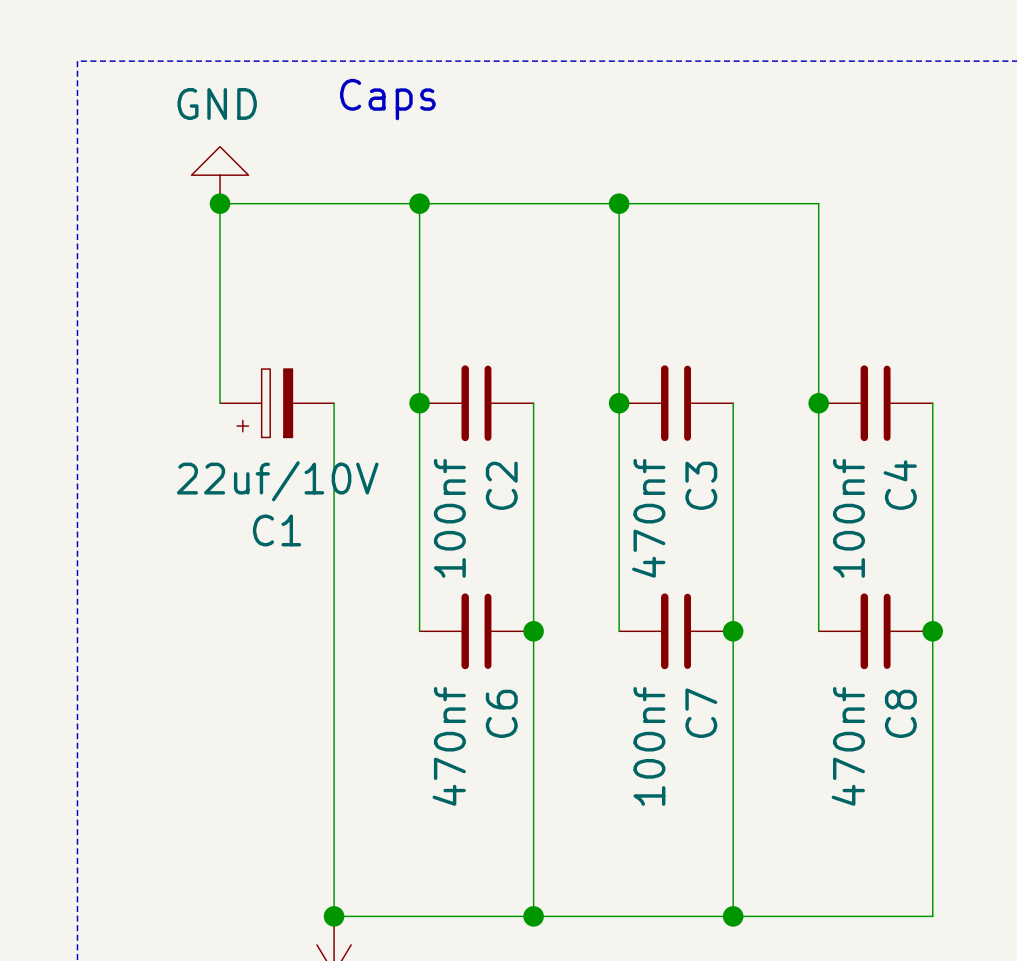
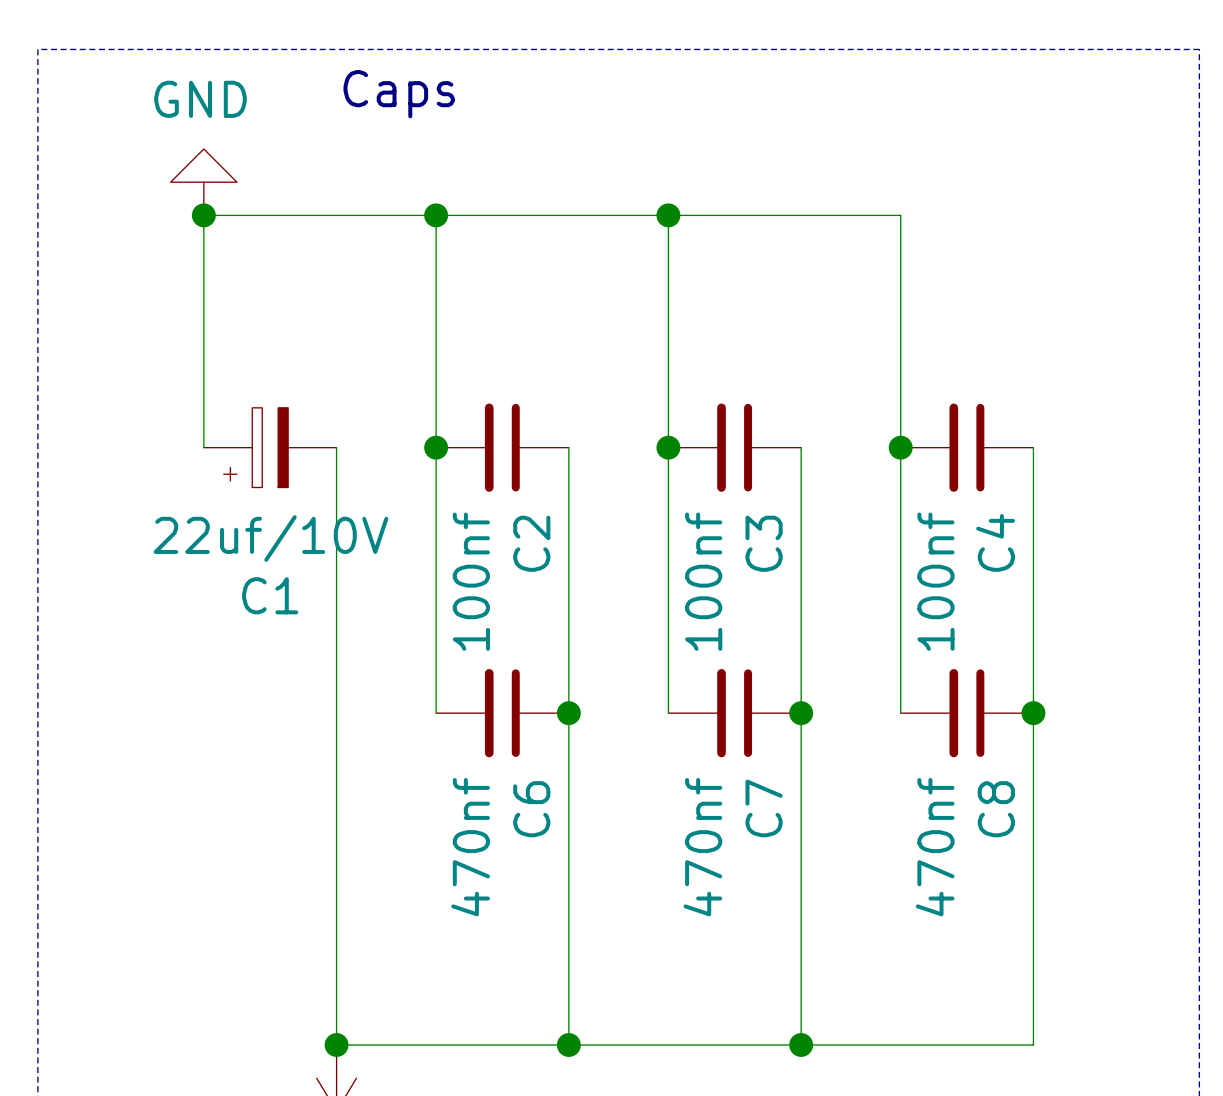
C3 value: 470nf (648, 518) -> 100nf (703, 581)
C7 value: 100nf (649, 746) -> 470nf (702, 847)

